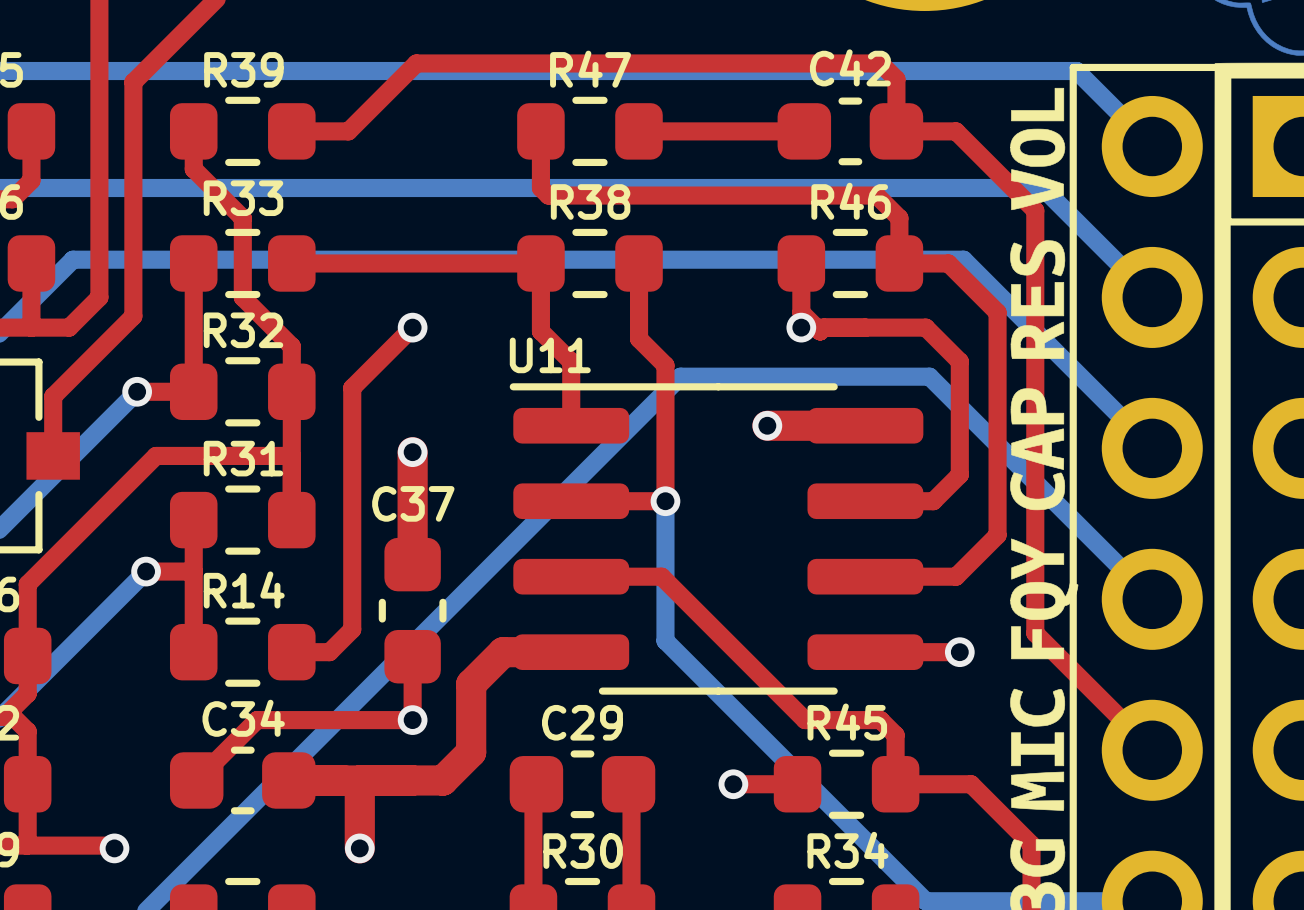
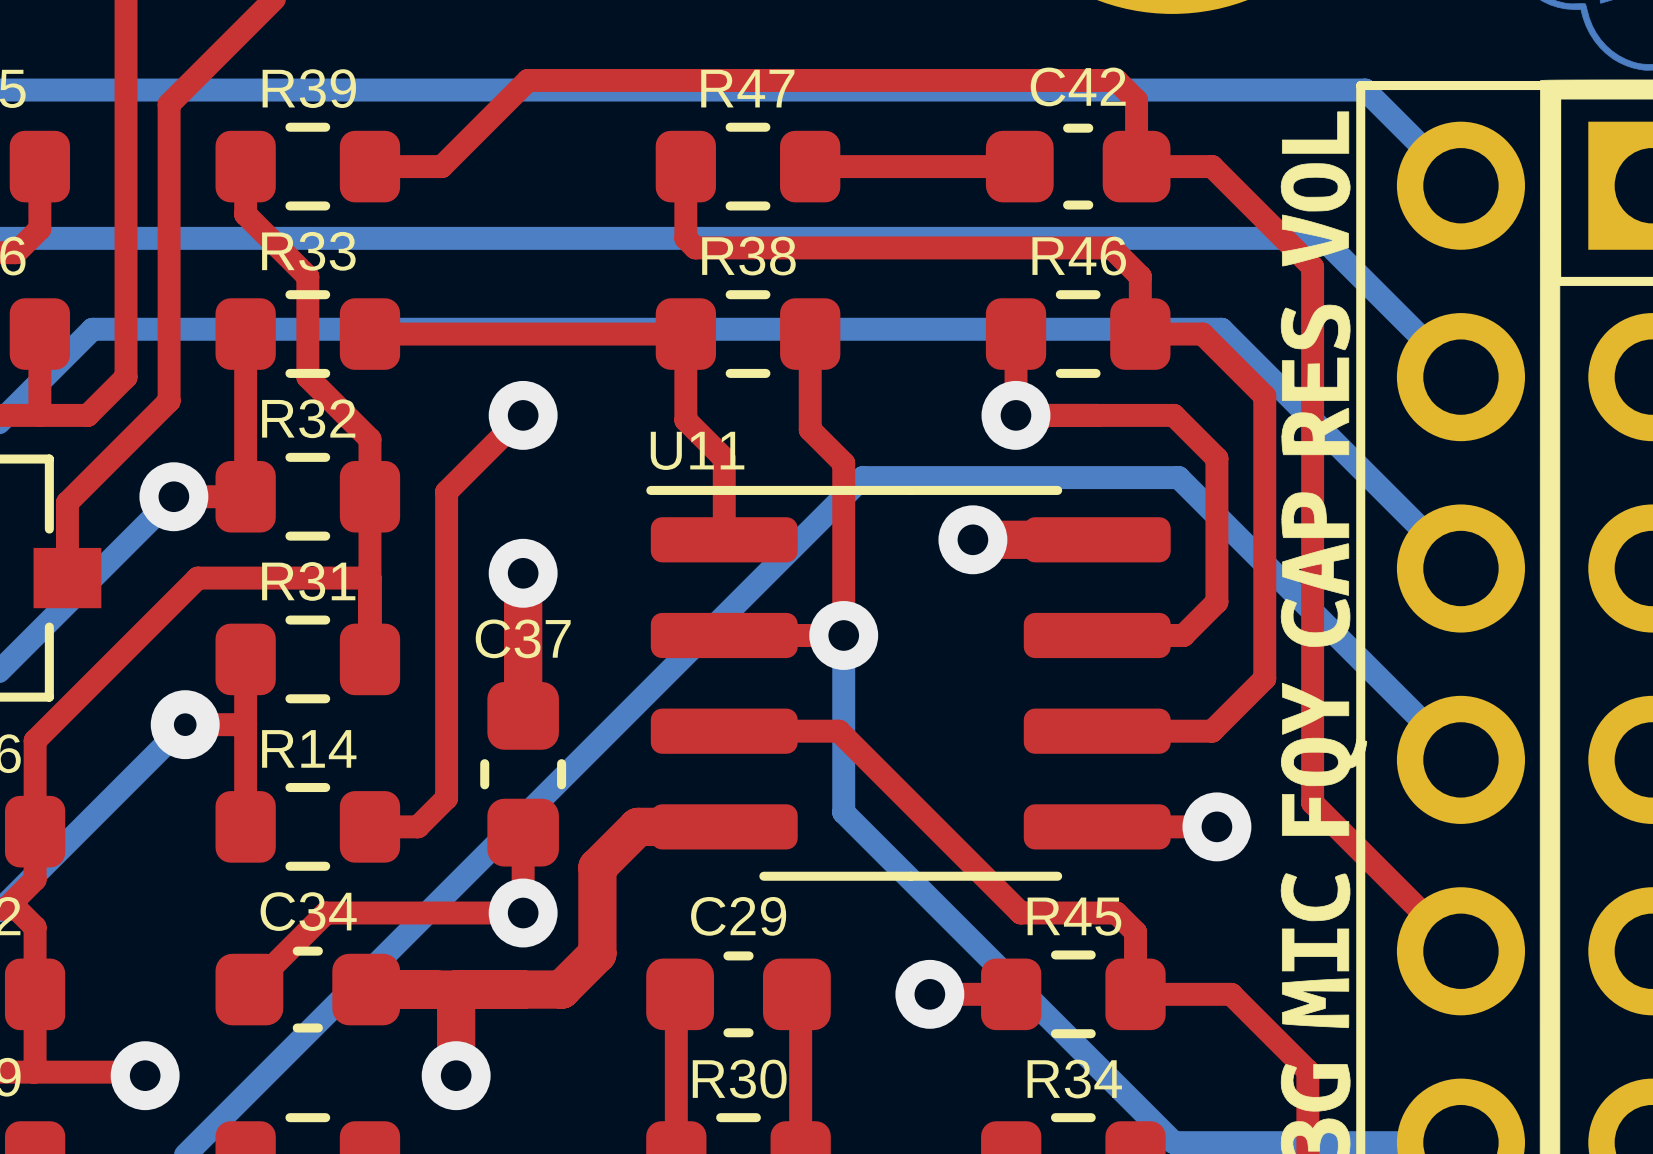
via size: [397, 312, 428, 343] -> [488, 380, 558, 450]
via size: [786, 312, 817, 343] -> [981, 380, 1051, 450]
via size: [122, 376, 153, 407] -> [139, 462, 209, 532]
via size: [752, 410, 783, 441] -> [938, 505, 1008, 575]
via size: [397, 437, 428, 468] -> [488, 538, 558, 608]
via size: [650, 486, 681, 517] -> [809, 601, 879, 670]
via size: [131, 556, 161, 587] -> [150, 690, 220, 760]
via size: [944, 637, 975, 668] -> [1182, 792, 1252, 862]
via size: [397, 705, 428, 735] -> [488, 878, 558, 948]
via size: [718, 769, 749, 800] -> [895, 959, 965, 1029]
via size: [99, 833, 130, 864] -> [110, 1041, 180, 1111]
via size: [344, 833, 375, 864] -> [421, 1041, 491, 1111]

